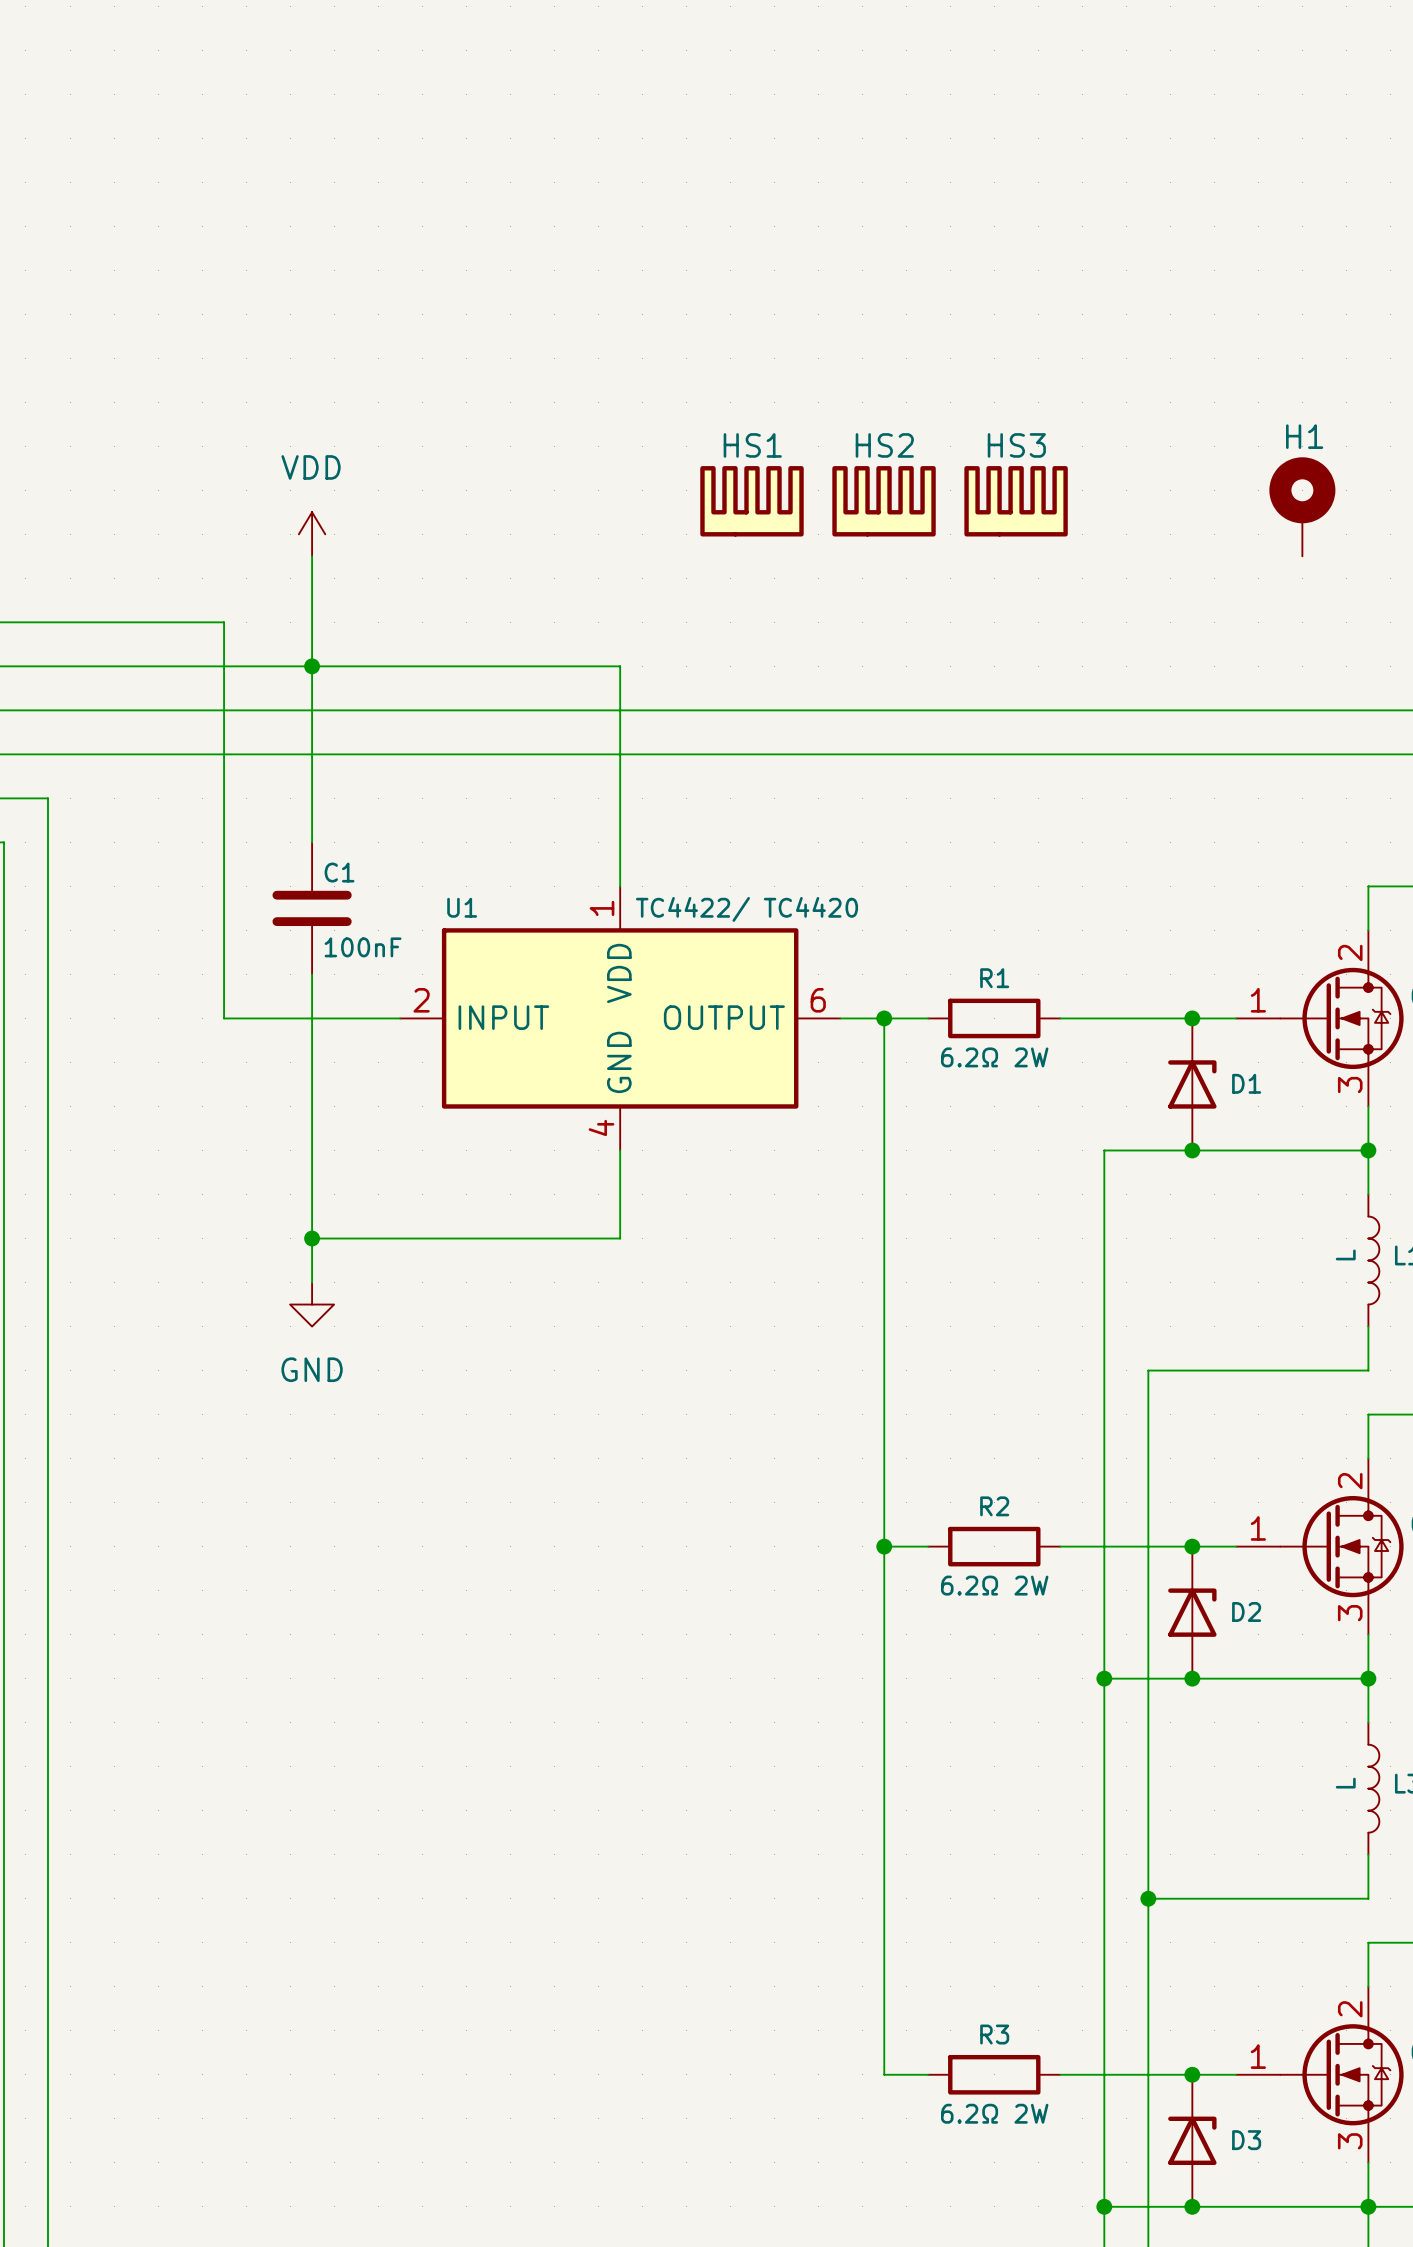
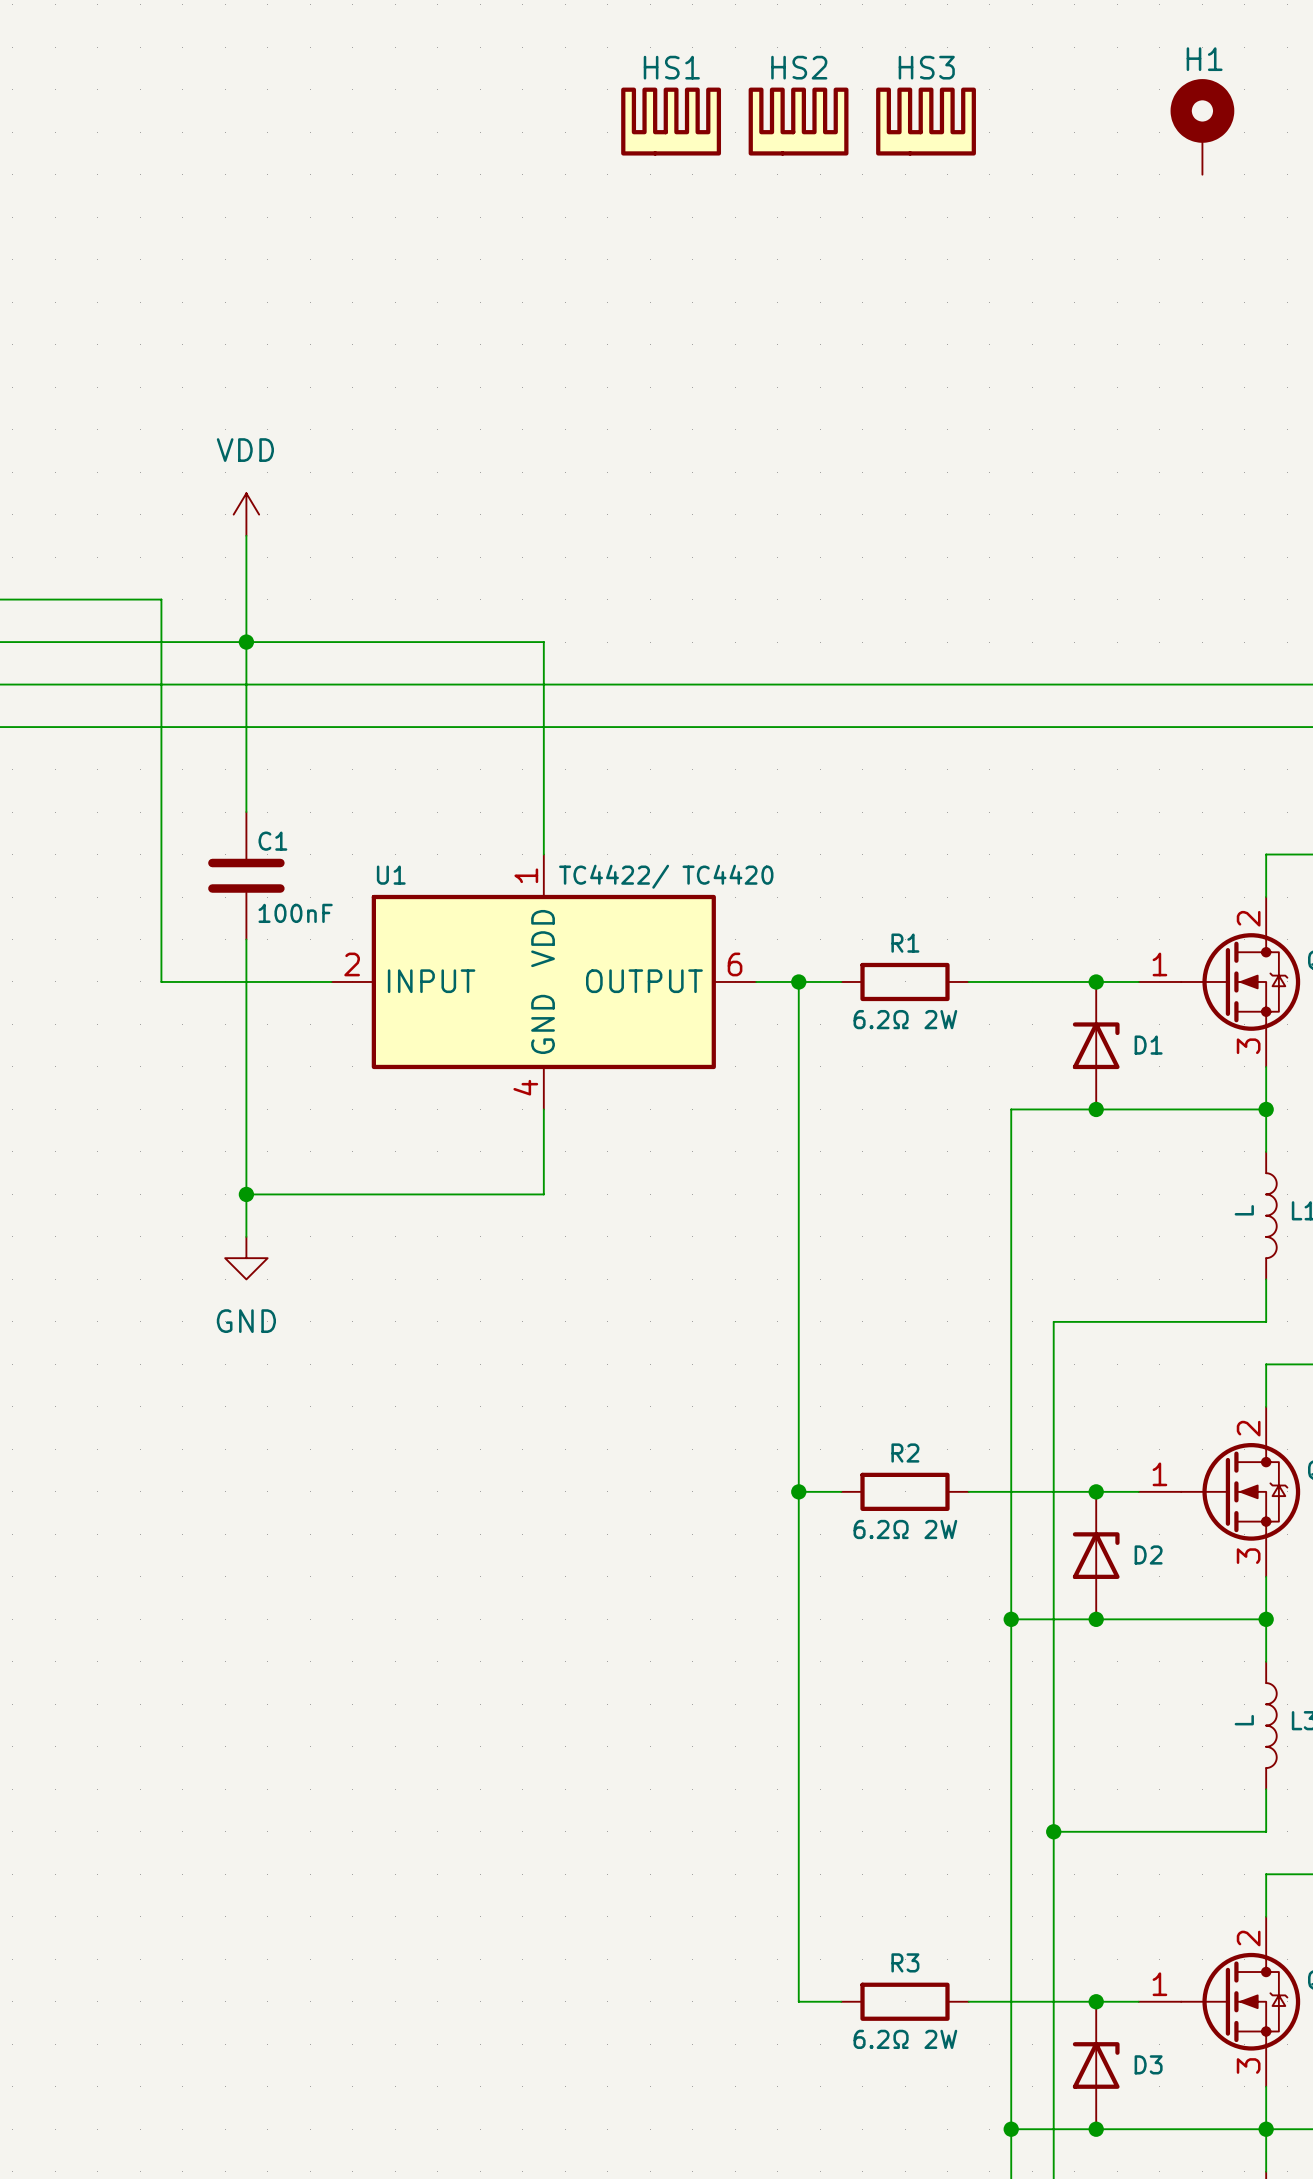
HS1 position: (751, 501) -> (671, 121)
HS2 position: (884, 501) -> (798, 121)
HS3 position: (1016, 501) -> (926, 121)
H1 position: (1302, 506) -> (1202, 126)

